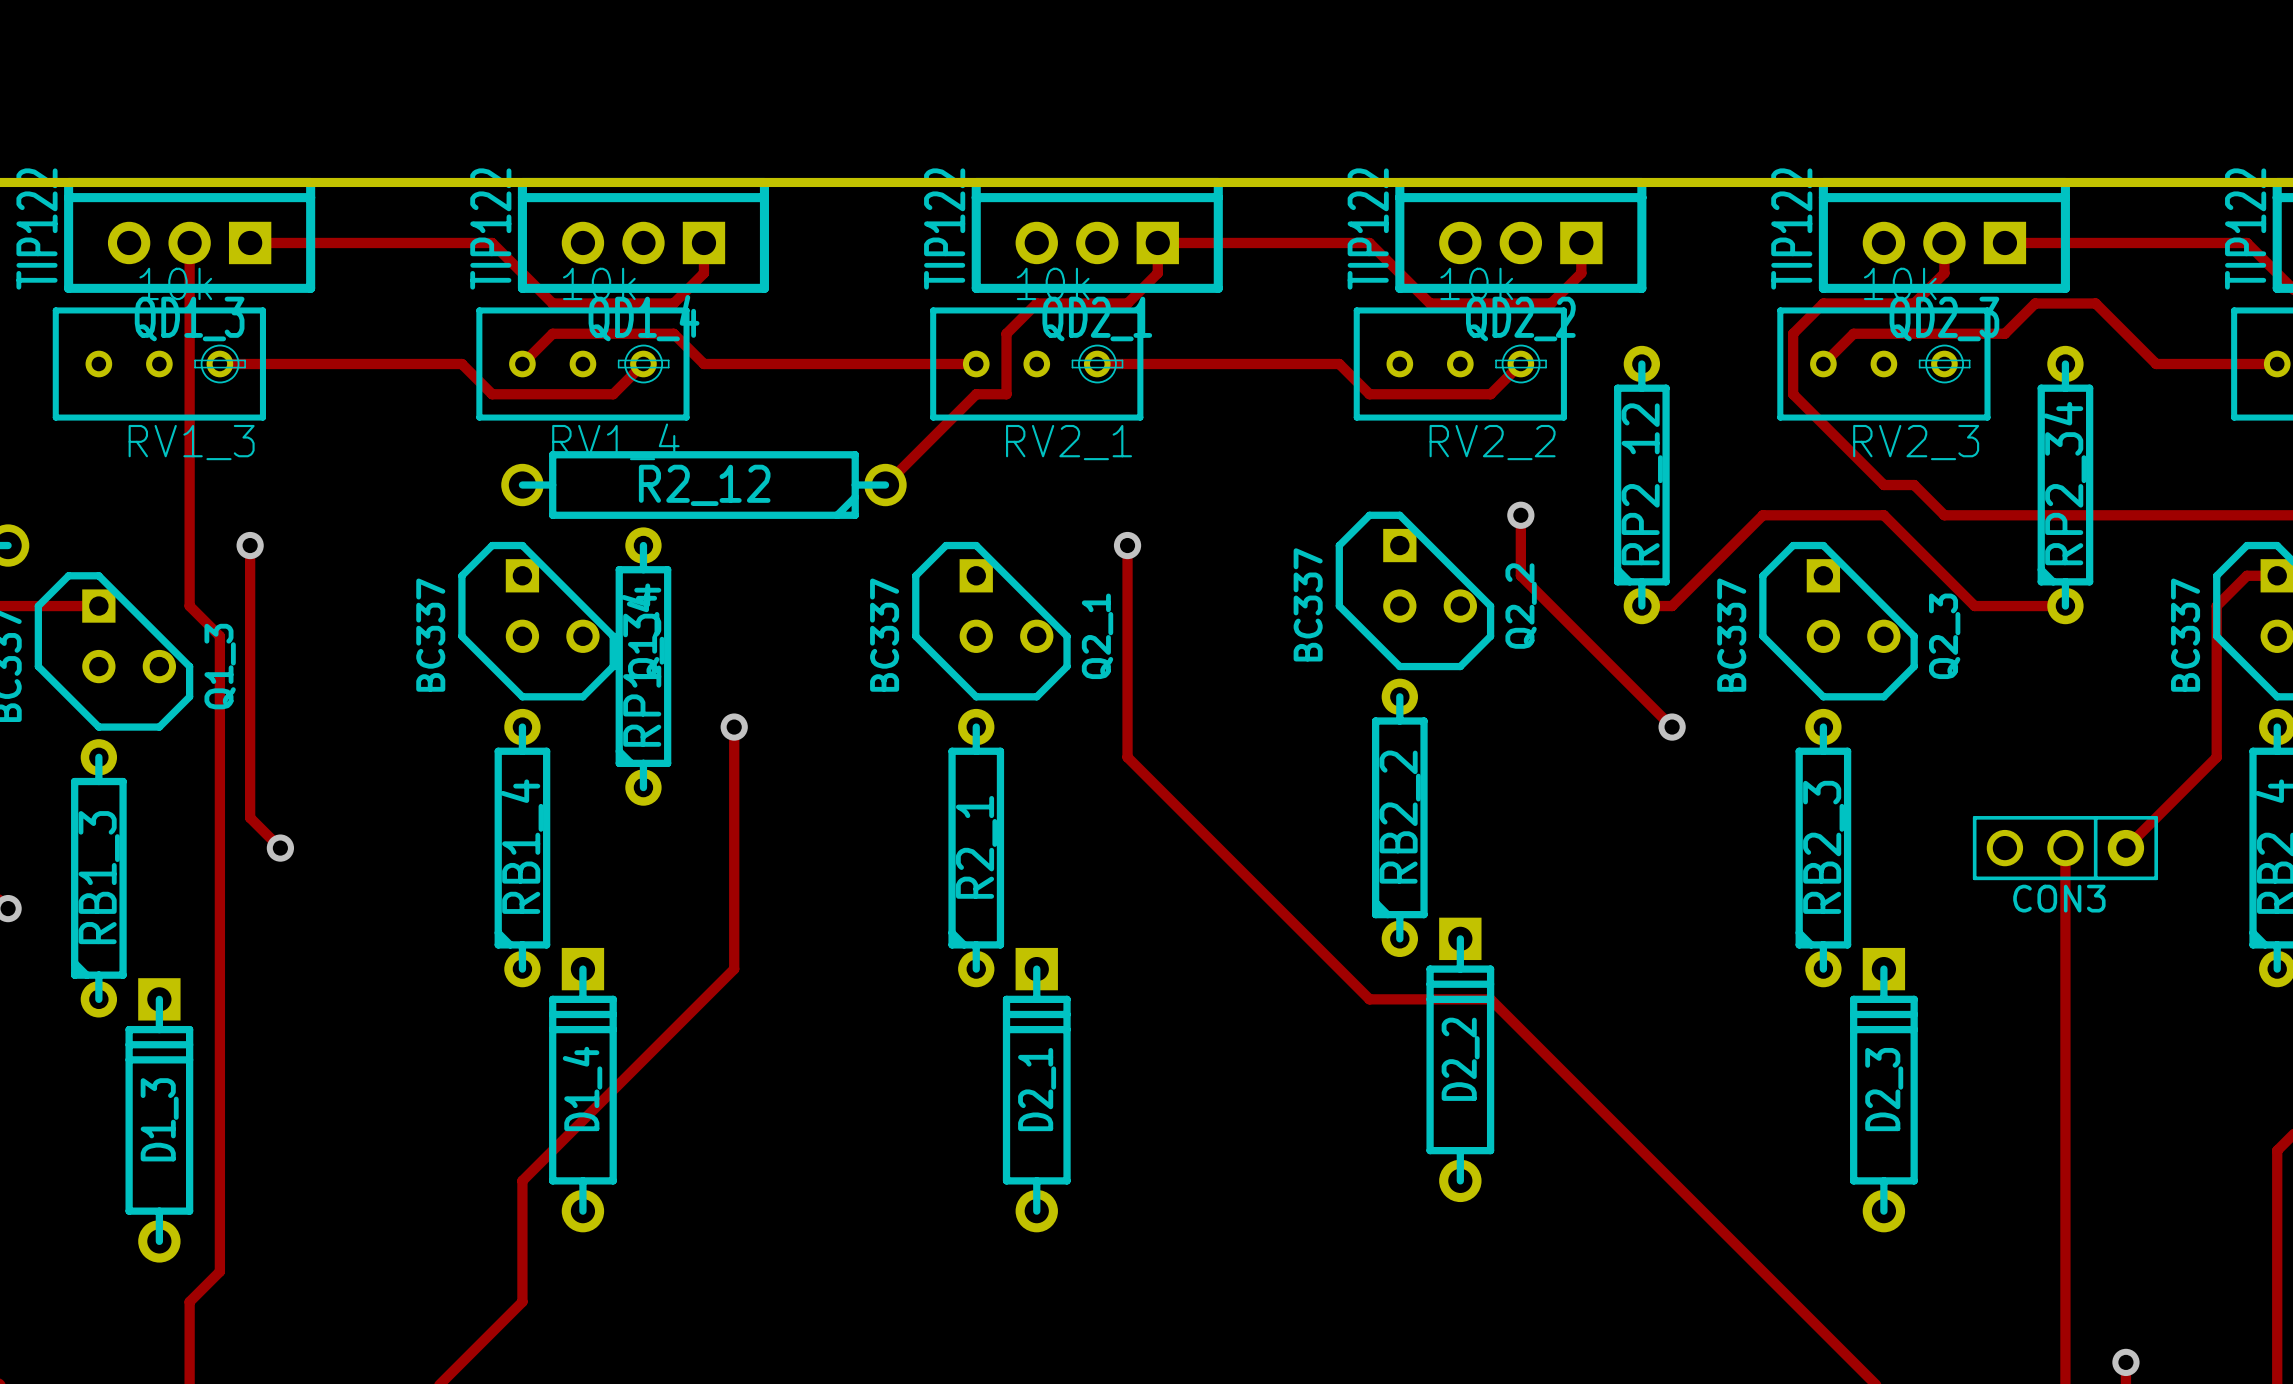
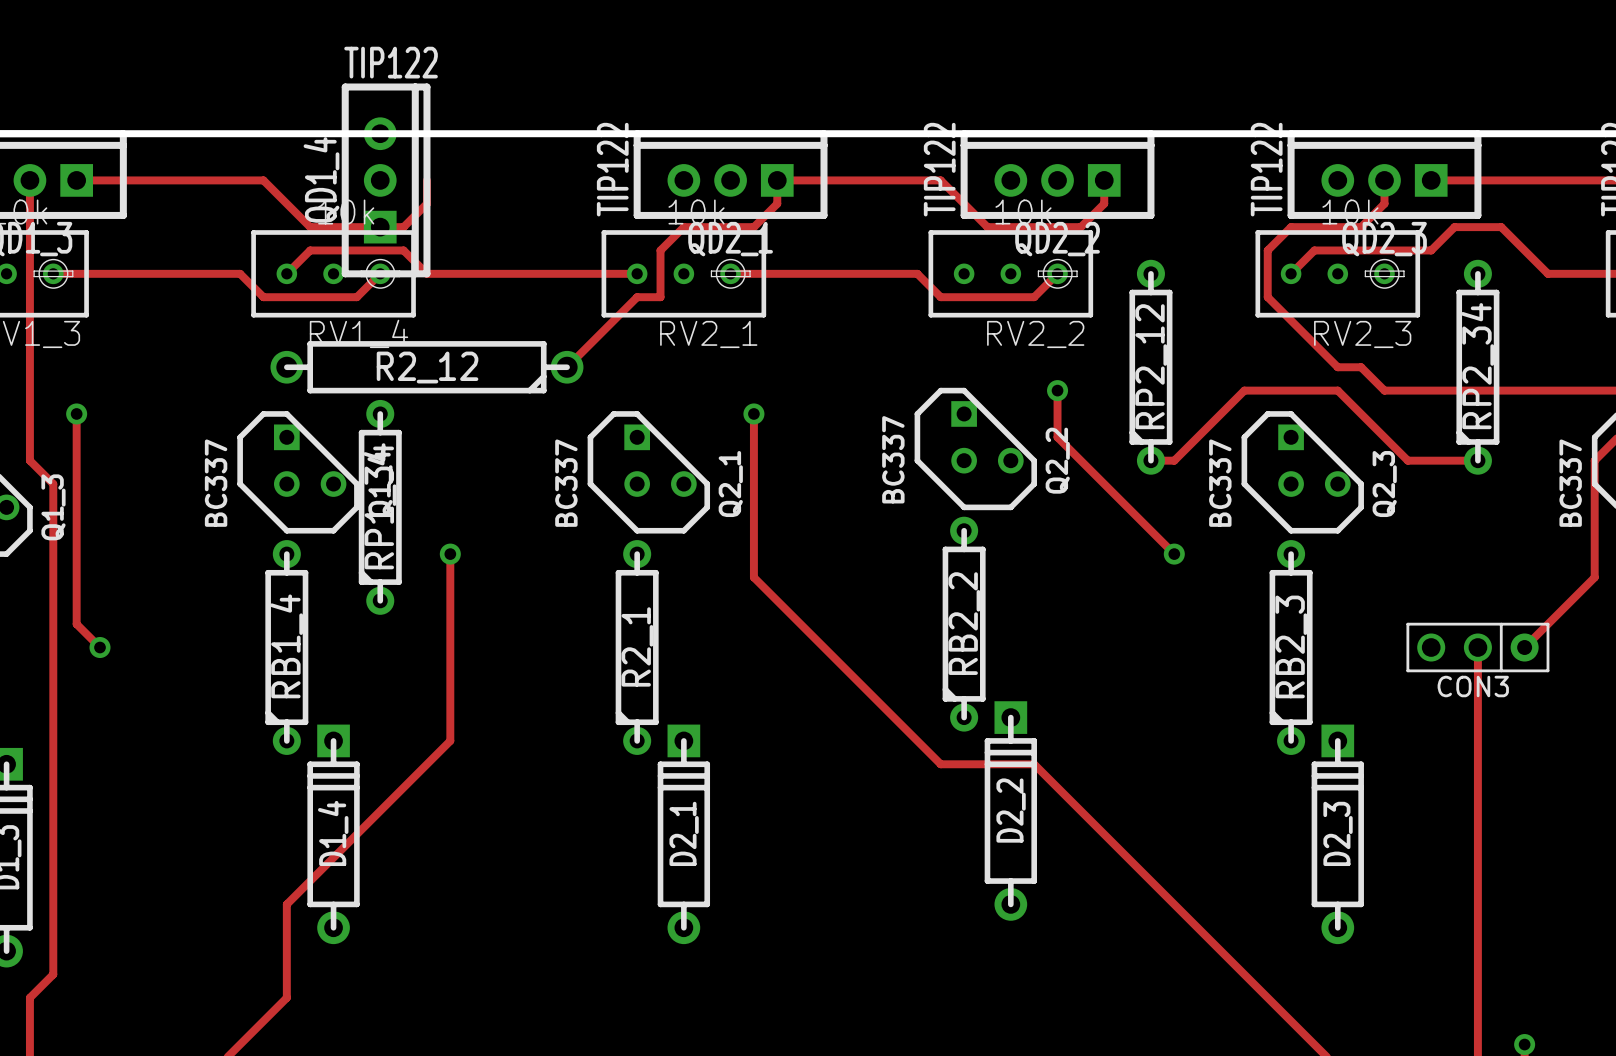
QD1_4 rotation: 0° (643, 235) -> 90° clockwise (386, 180)

